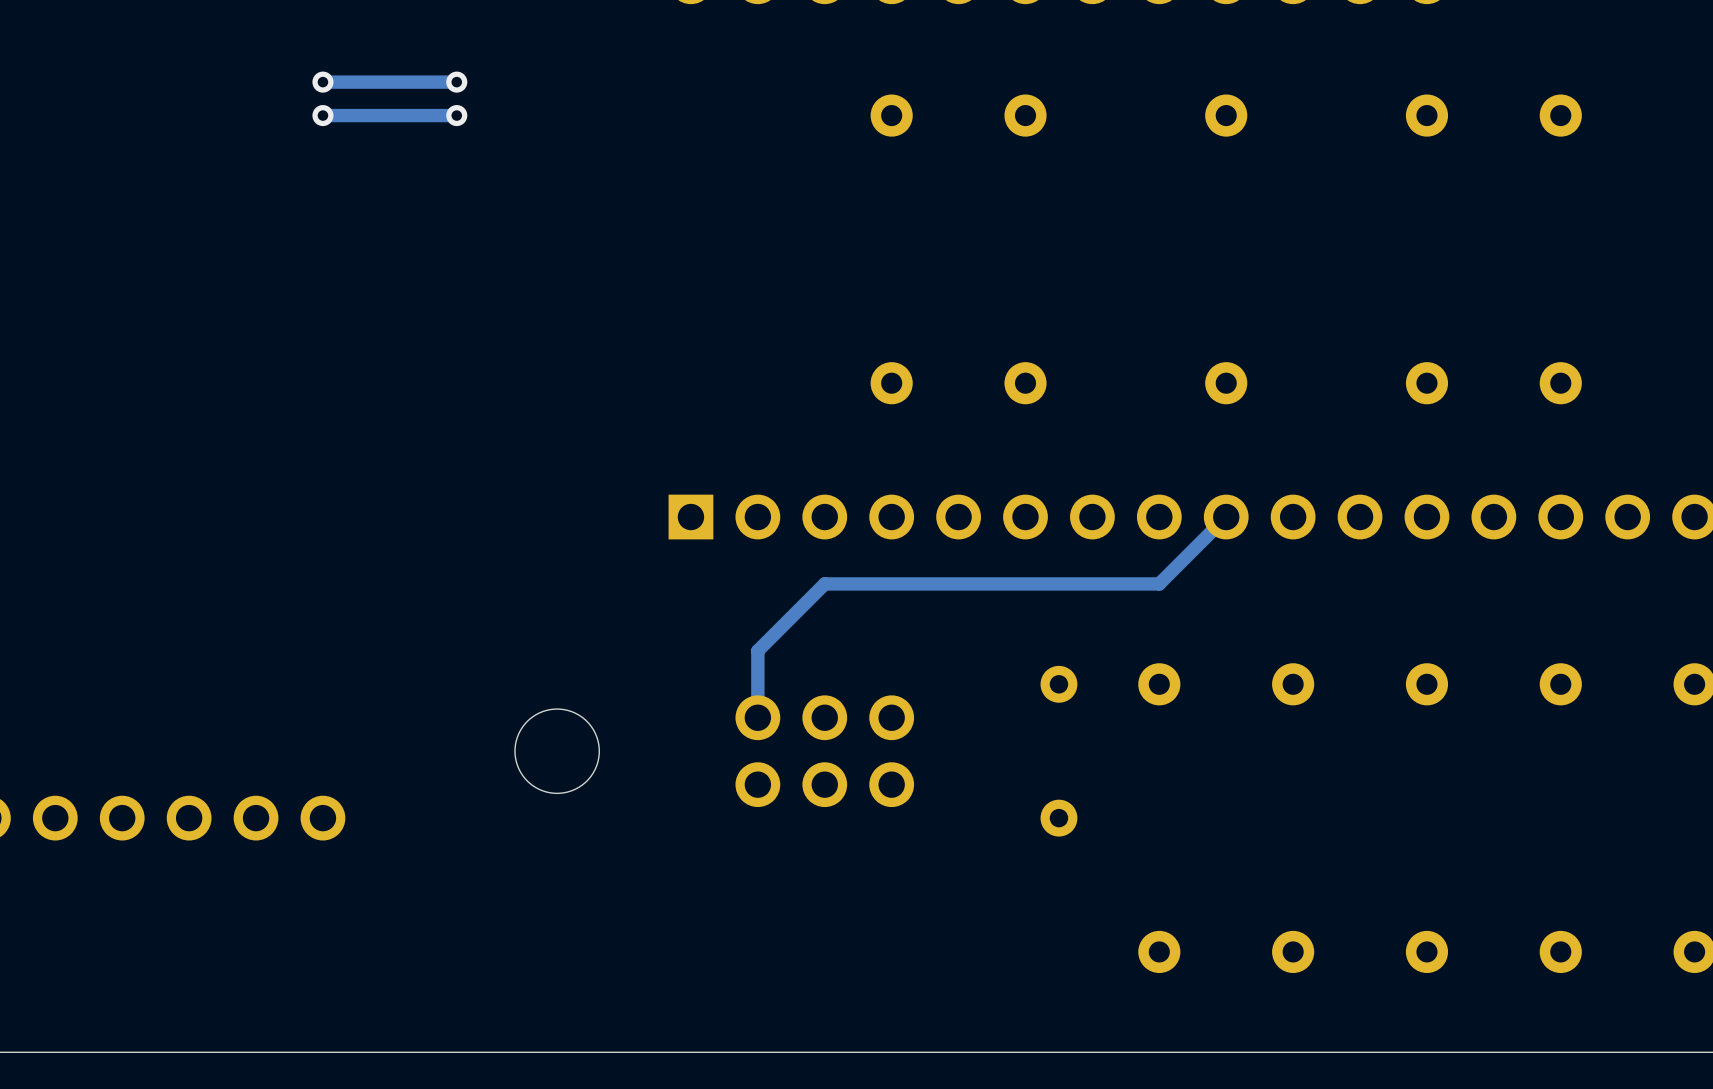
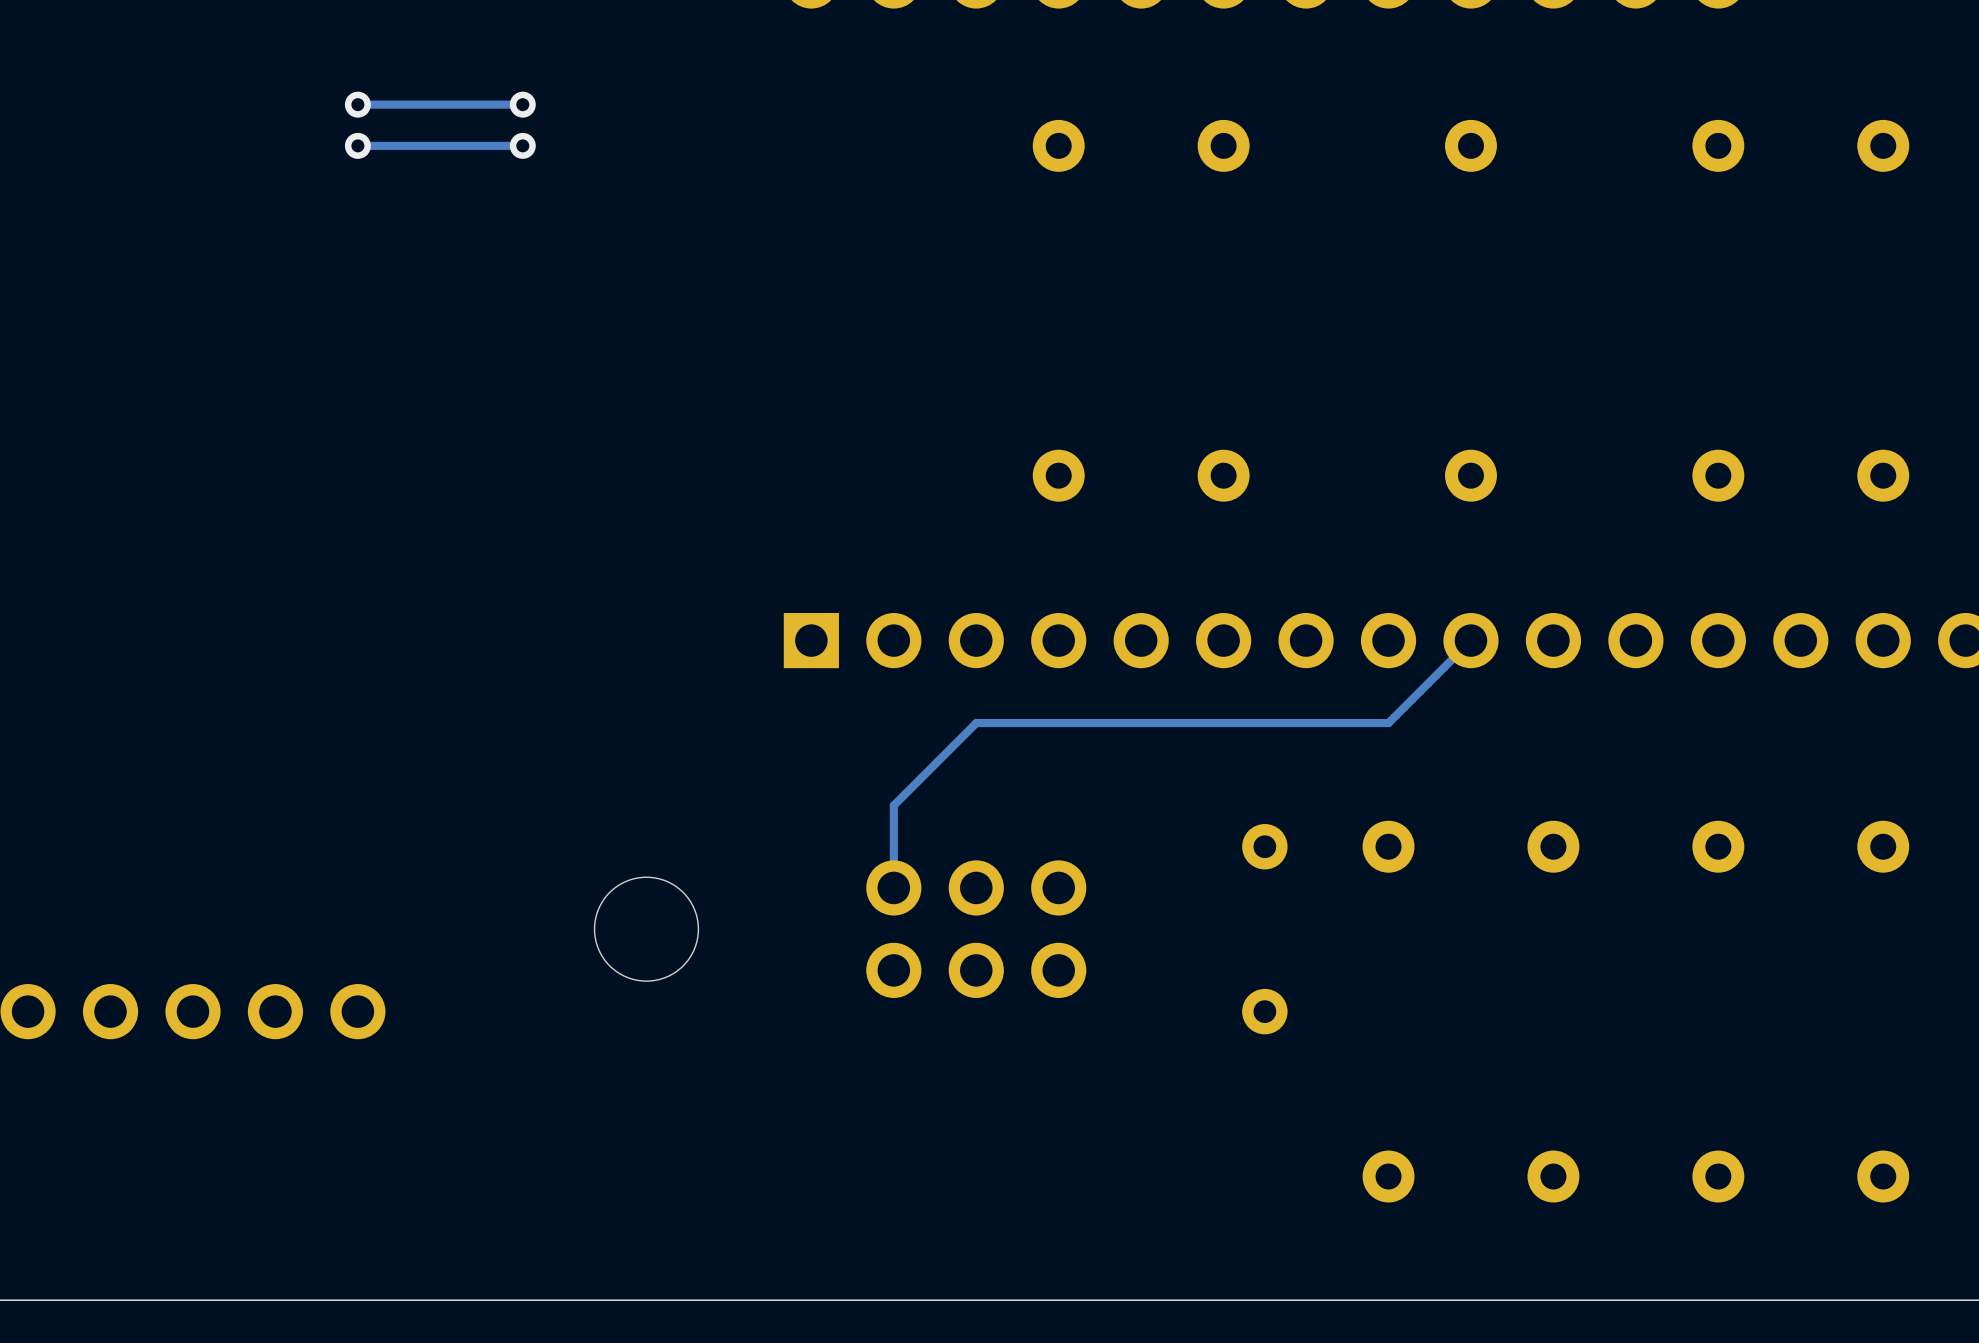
track width: thick (456, 82) (322, 82) -> thin (522, 104) (357, 104)
track width: thick (456, 115) (322, 115) -> thin (522, 145) (357, 145)
track width: thick (1226, 517) (1159, 583) (824, 583) (757, 650) (757, 717) -> thin (1470, 640) (1388, 723) (976, 723) (893, 805) (893, 887)

